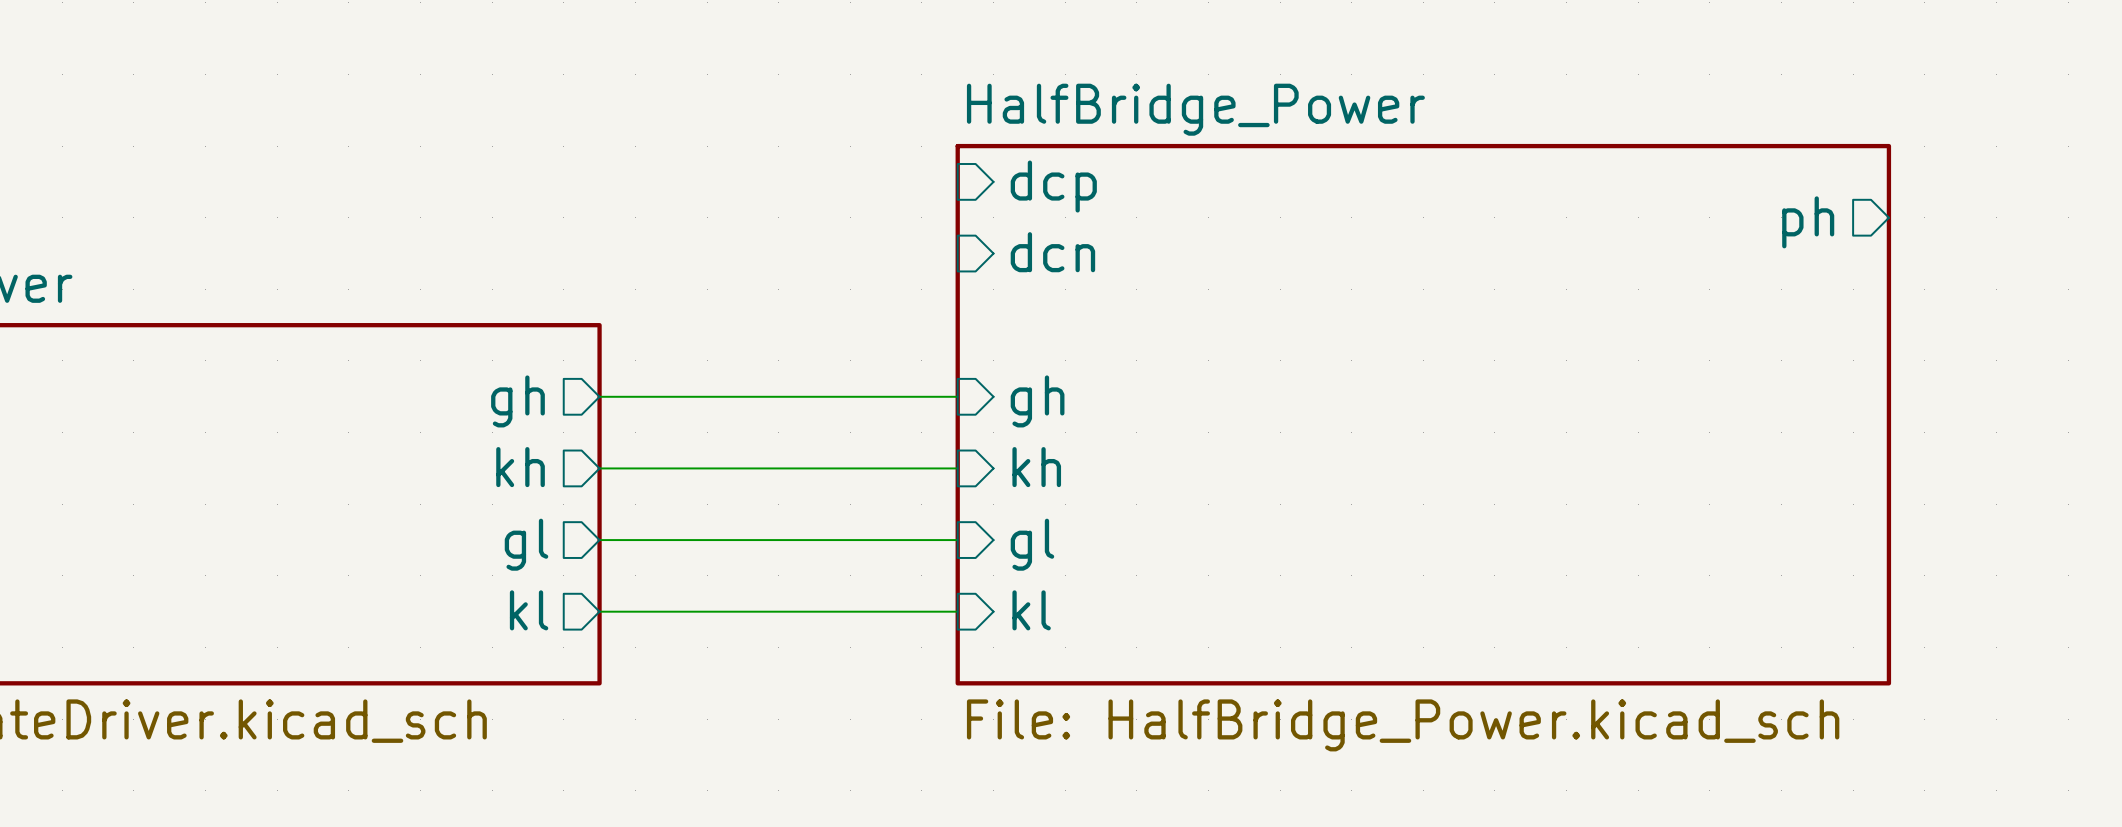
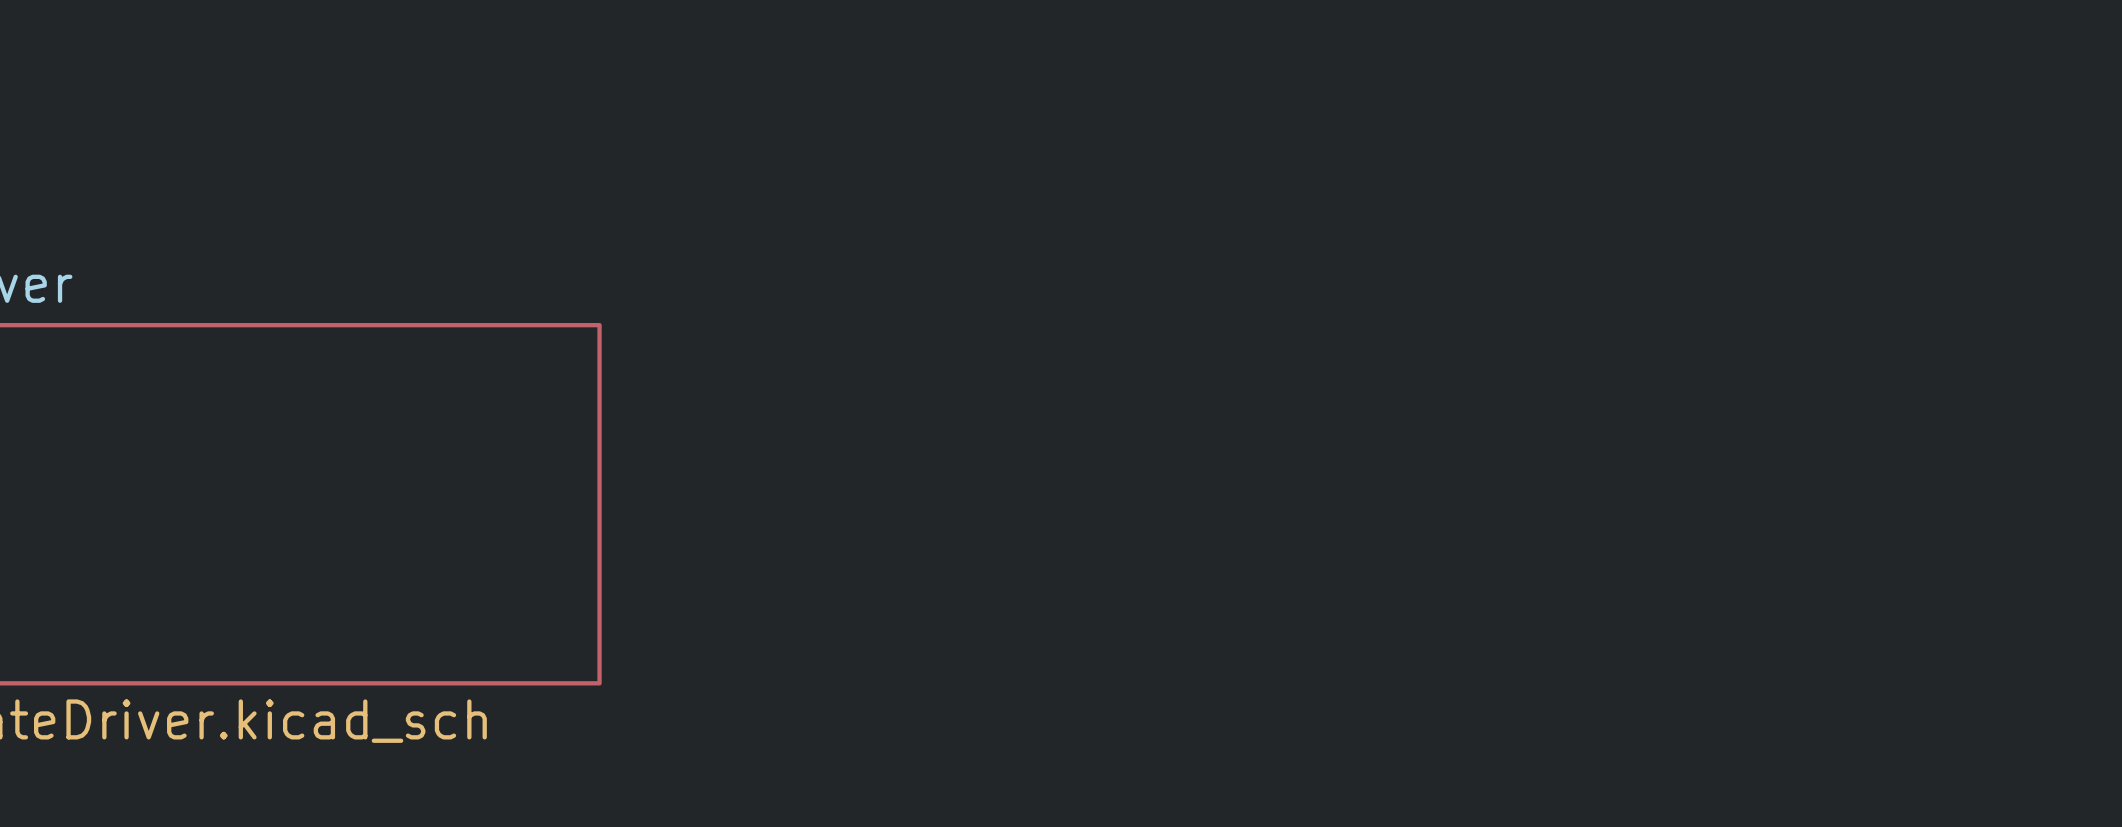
sheet pin: dcp (1053, 186) -> none
sheet pin: ph (1808, 222) -> none
sheet pin: dcn (1052, 252) -> none
wire: (599, 396) (957, 396) -> none
sheet pin: gh (517, 401) -> none
sheet pin: gh (1037, 401) -> none
sheet HalfBridge_Power: File: HalfBridge_Power.kicad_sch (1423, 414) -> none
sheet pin: kh (520, 467) -> none
sheet pin: kh (1036, 467) -> none
wire: (599, 468) (957, 468) -> none
wire: (599, 540) (957, 540) -> none
sheet pin: gl (526, 544) -> none
sheet pin: gl (1032, 544) -> none
sheet pin: kl (529, 610) -> none
sheet pin: kl (1031, 610) -> none
wire: (599, 611) (957, 611) -> none

